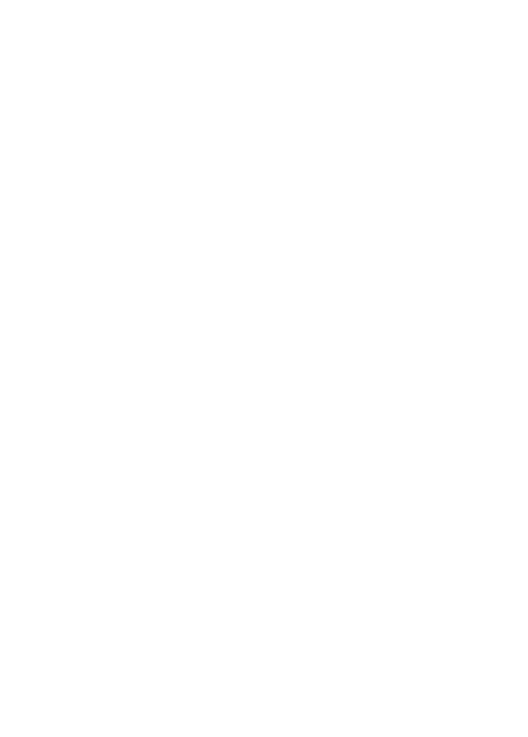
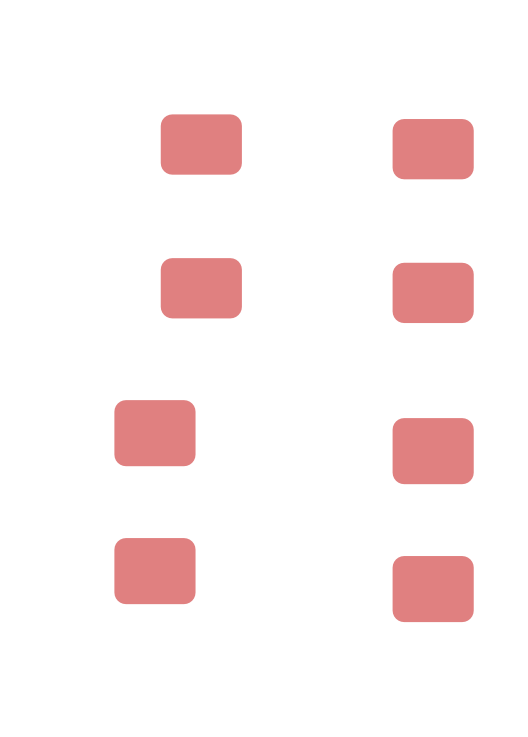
part: none -> (201, 216)
part: none -> (433, 221)
part: none -> (154, 502)
part: none -> (433, 520)

